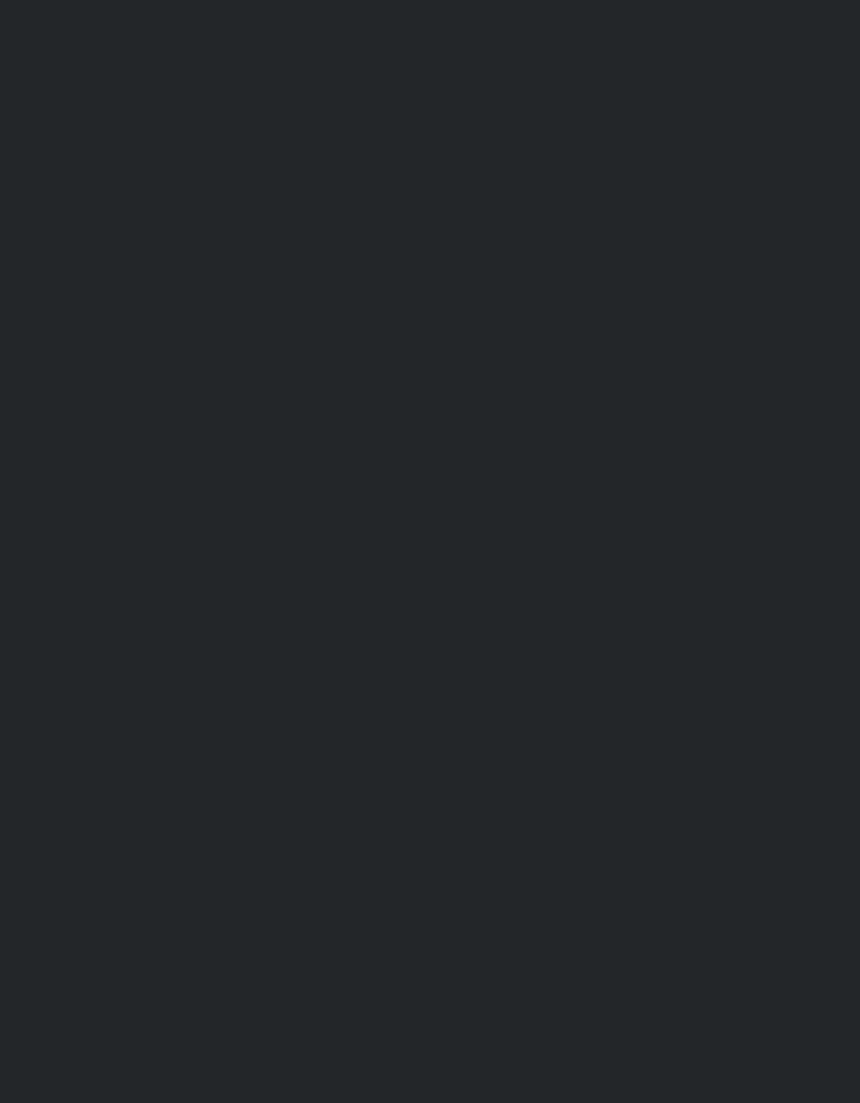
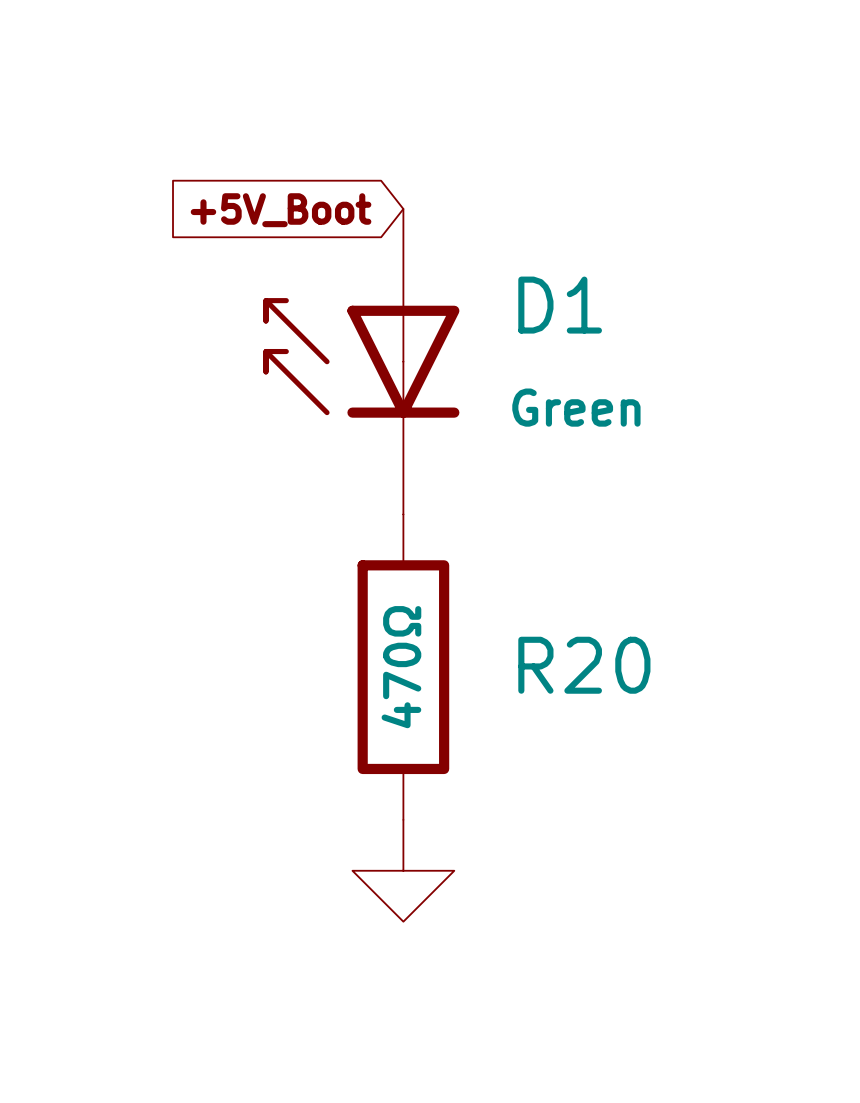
global label: none -> +5V_Boot (281, 210)
D1: none -> Green (361, 361)
R20: none -> 470Ω (403, 667)
power symbol: none -> (403, 870)

